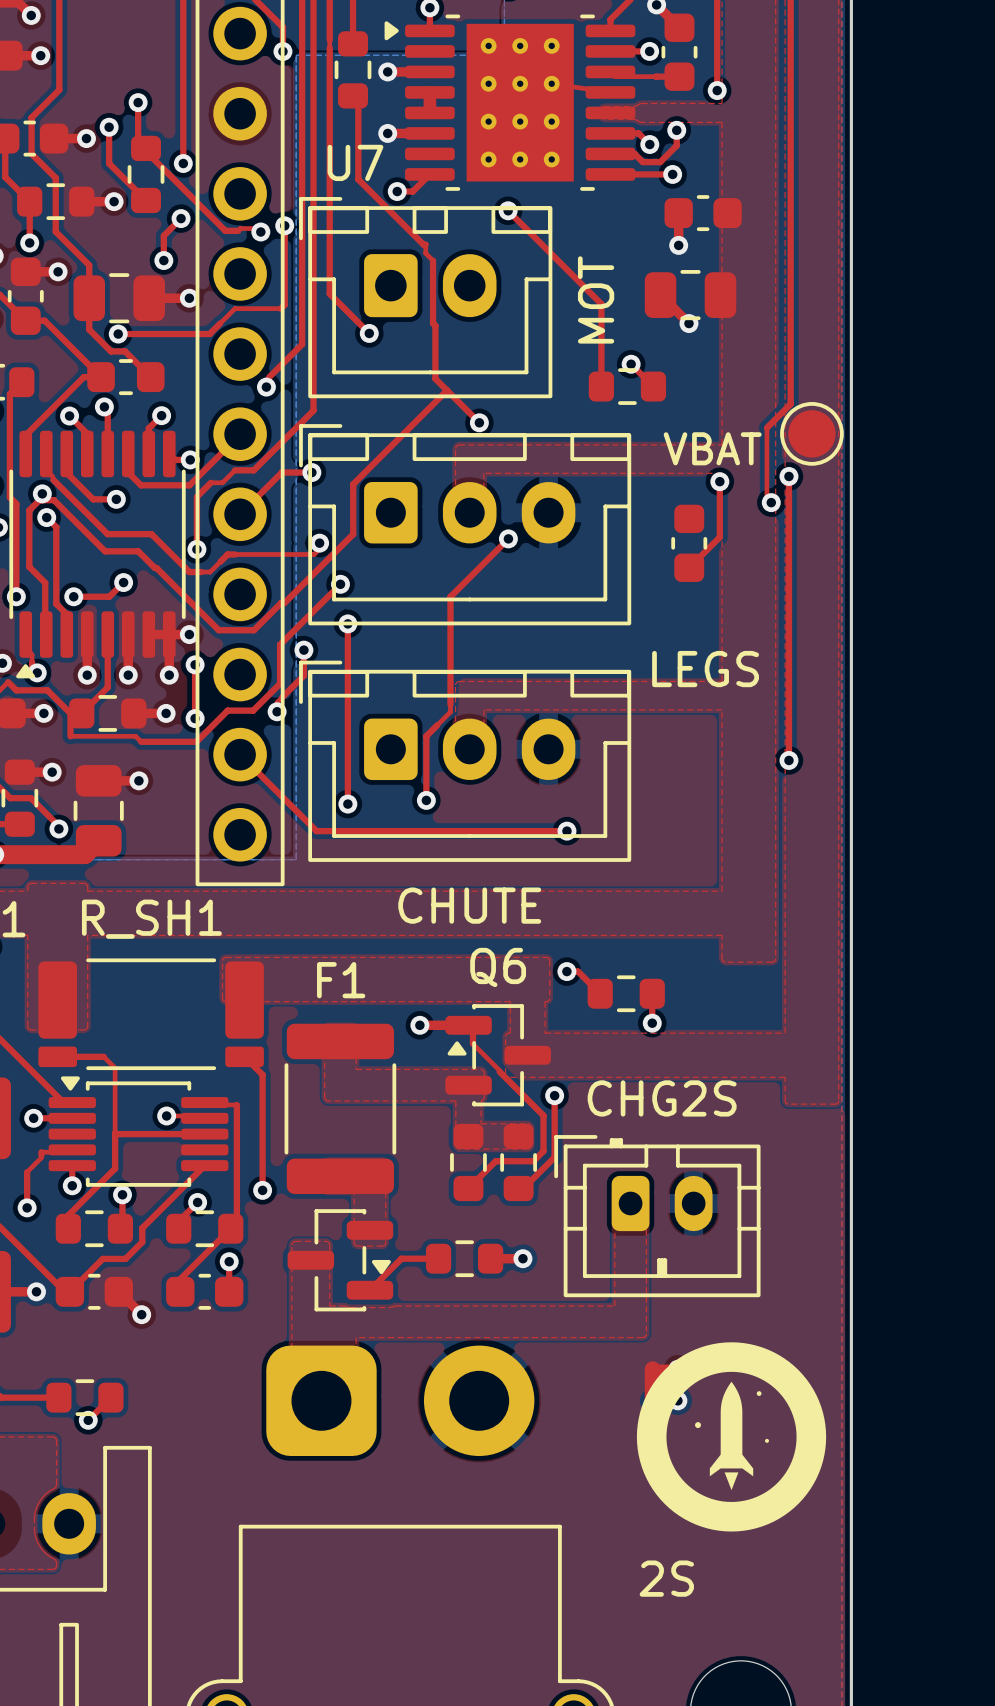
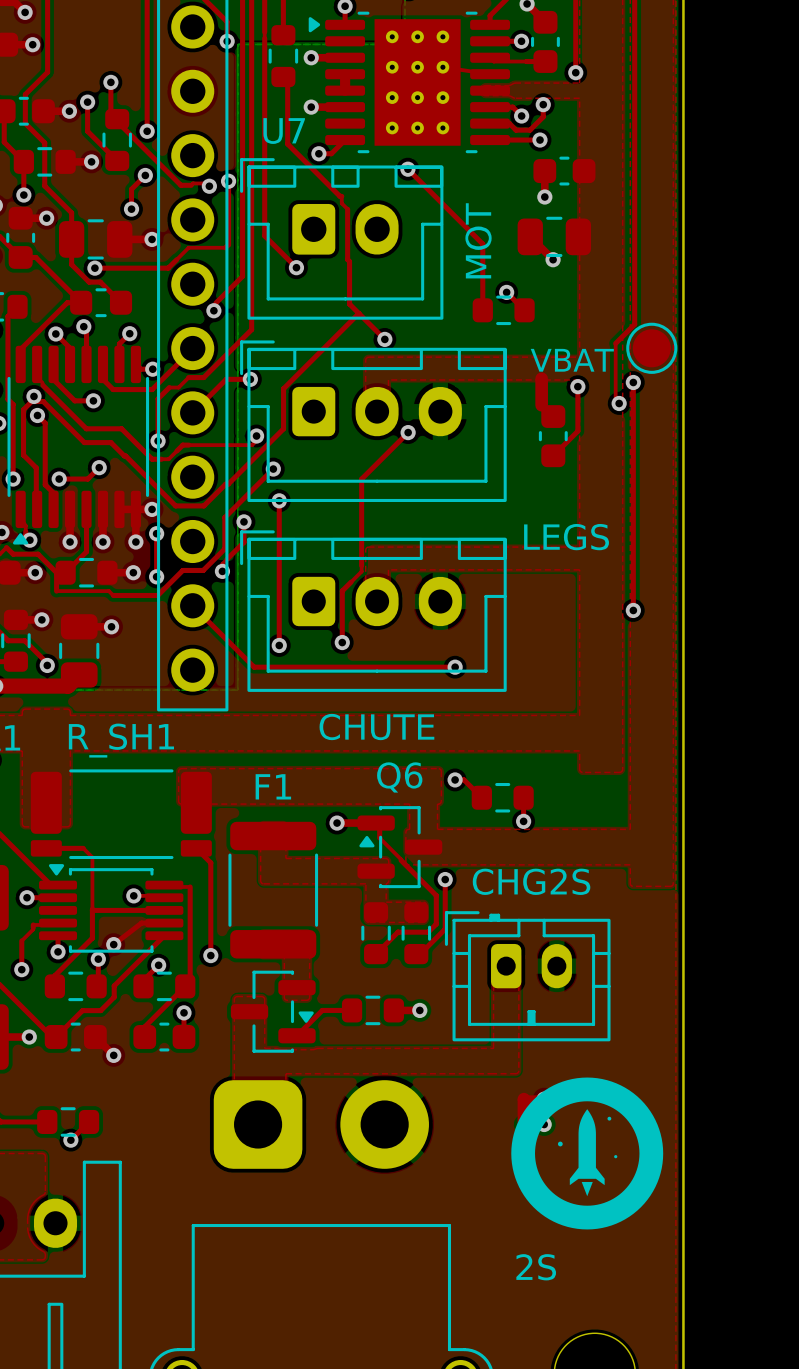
top track: none -> (541, 378) (541, 405)
top track: none -> (164, 923) (141, 923) (113, 944)
via: none -> (113, 944)

